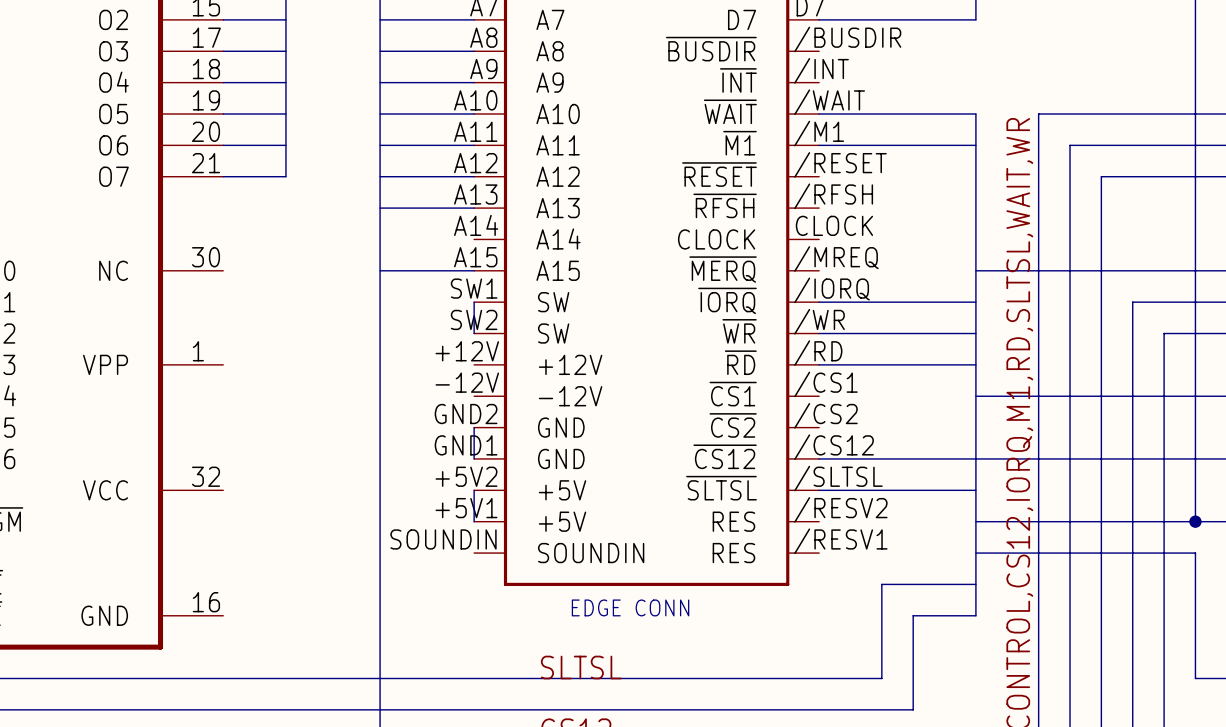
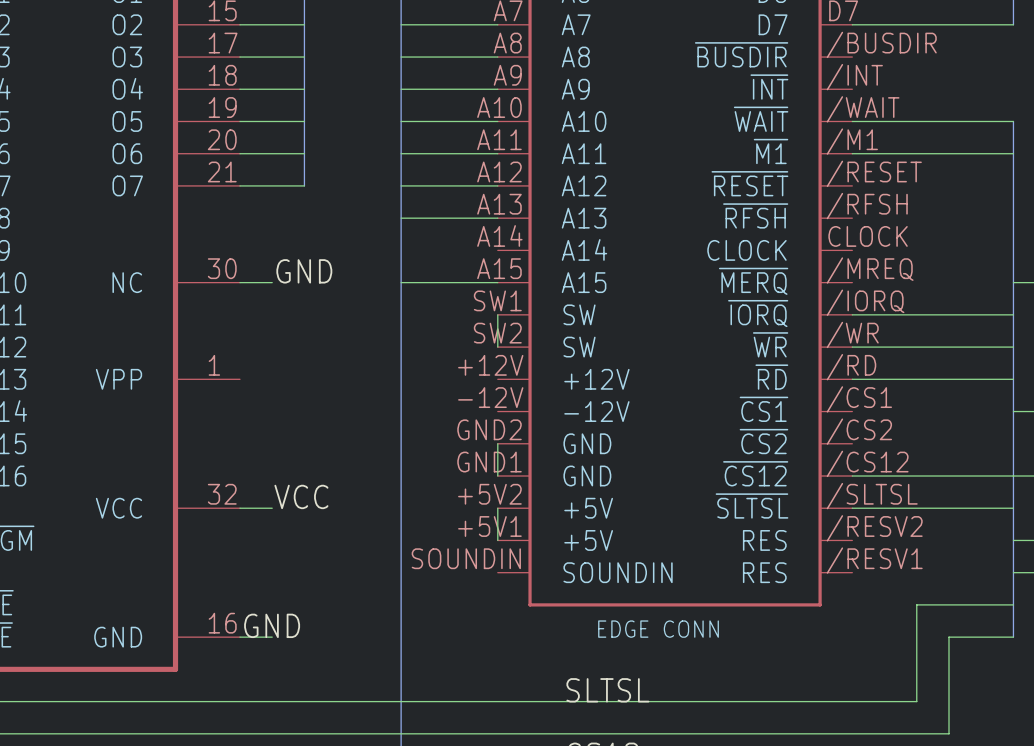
label: none -> GND (304, 271)
wire: none -> (239, 282) (272, 282)
label: none -> VCC (301, 496)
wire: none -> (239, 508) (272, 508)
label: none -> GND (272, 625)
wire: none -> (239, 637) (272, 637)

